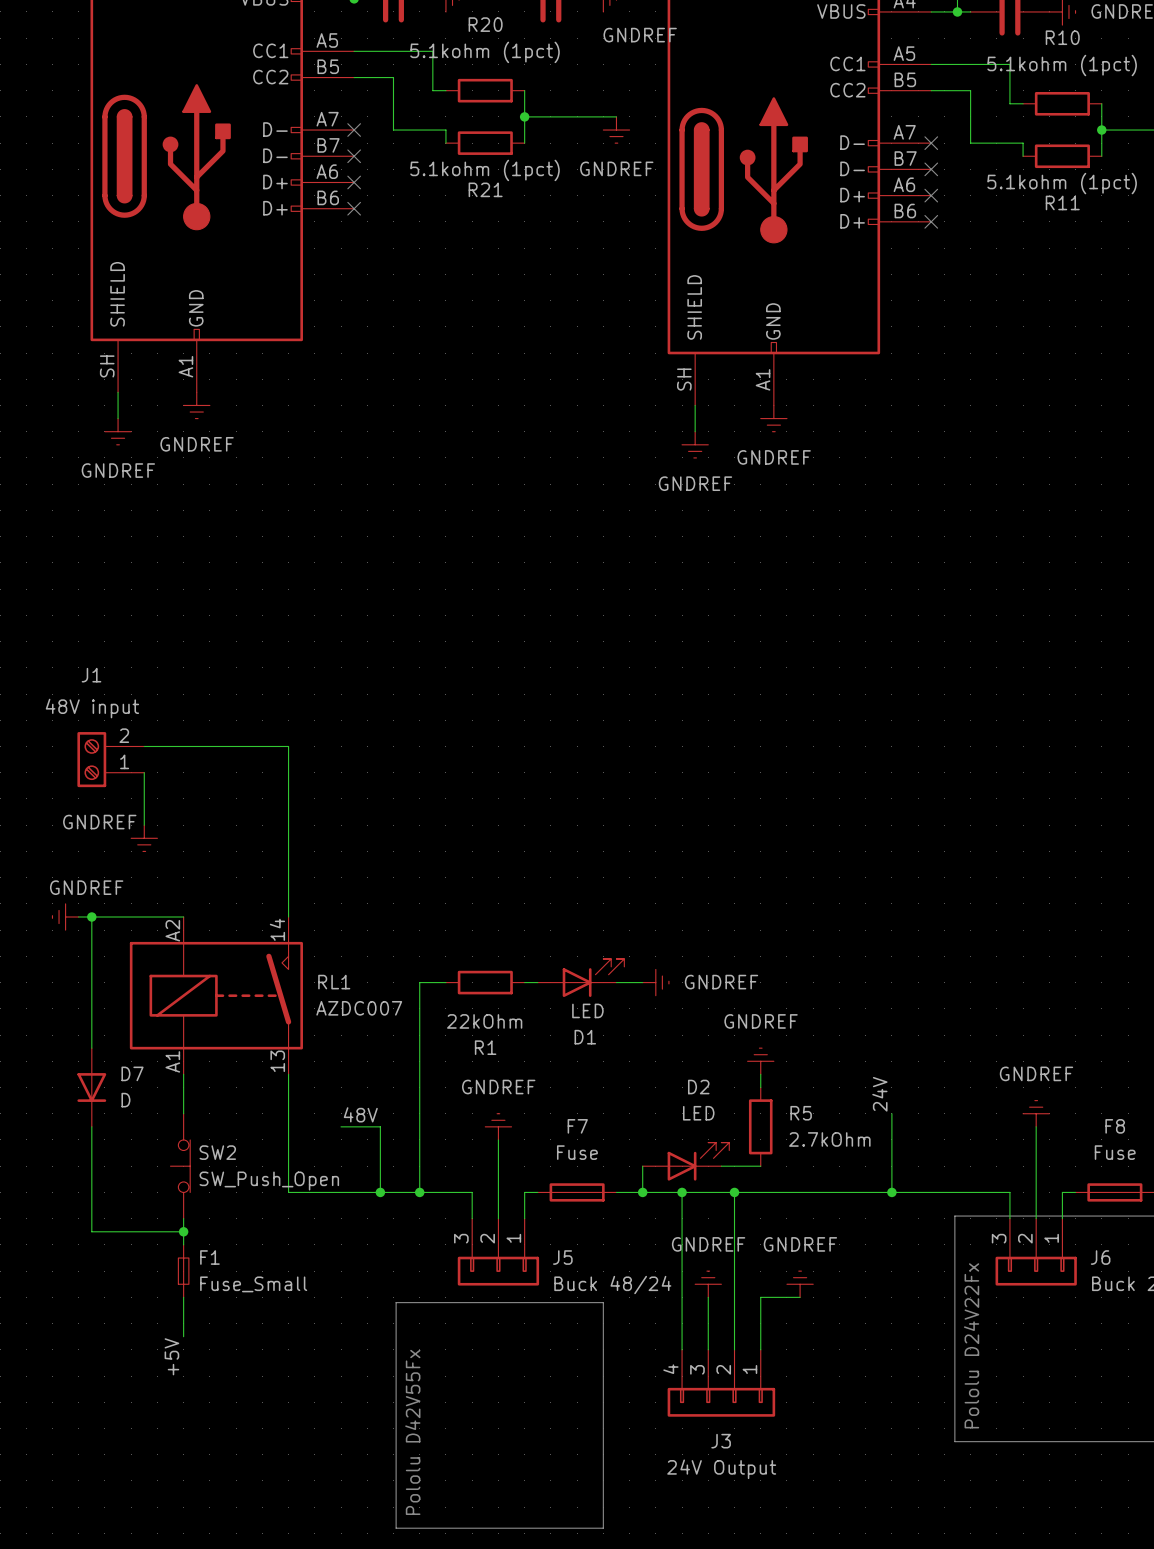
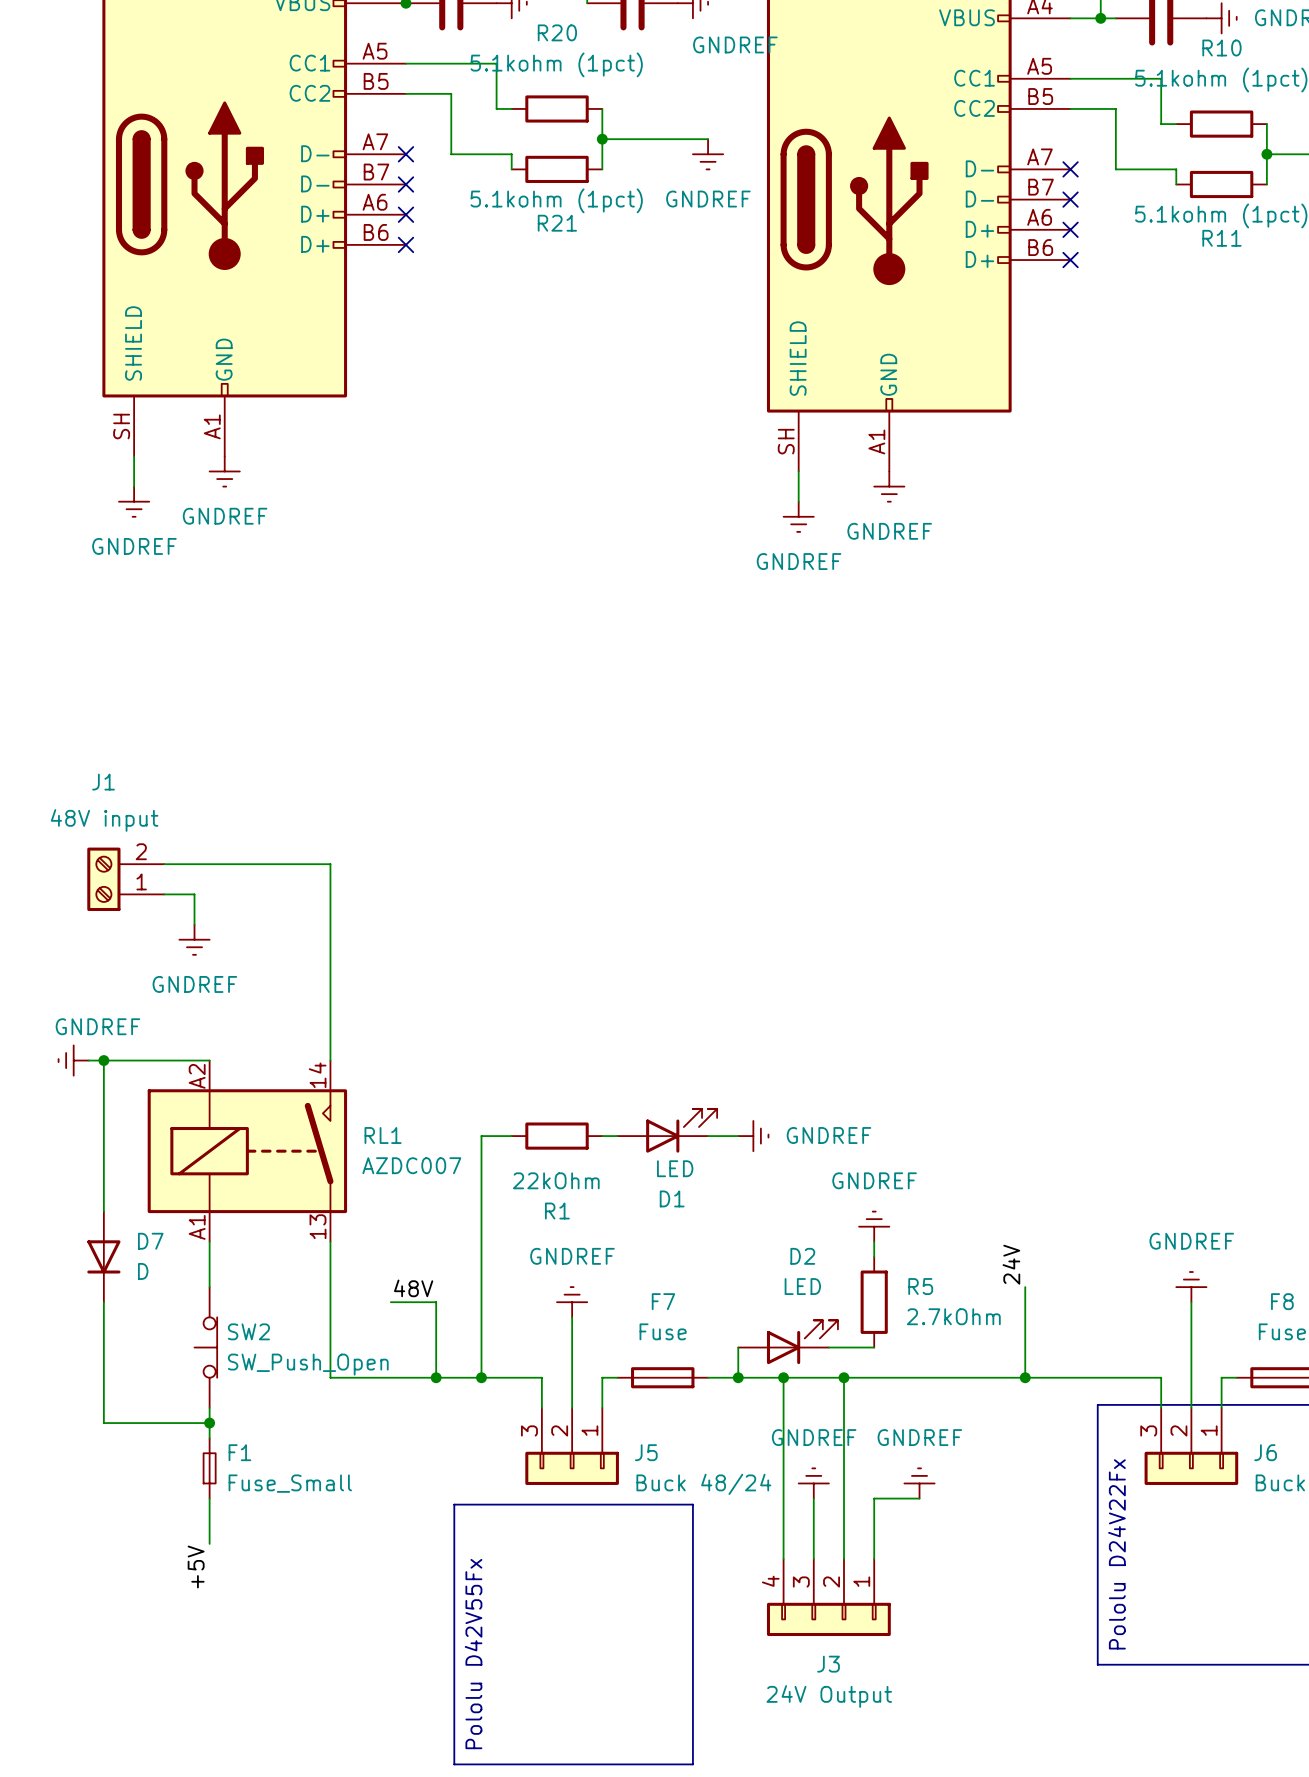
wire: (144, 772) (144, 825) -> (164, 894) (194, 894) (194, 924)
power symbol text position: GNDREF (99, 822) -> GNDREF (194, 984)
power symbol position: GNDREF (144, 838) -> GNDREF (194, 939)

